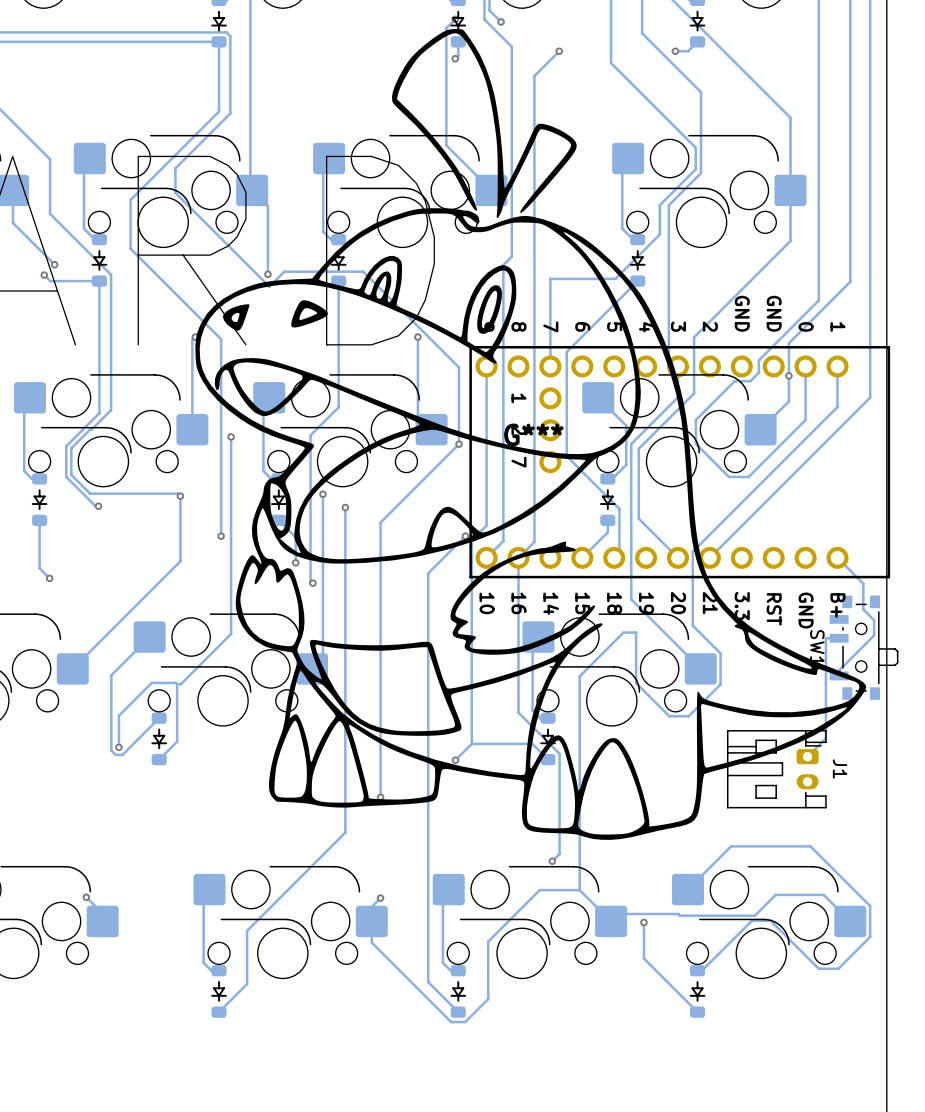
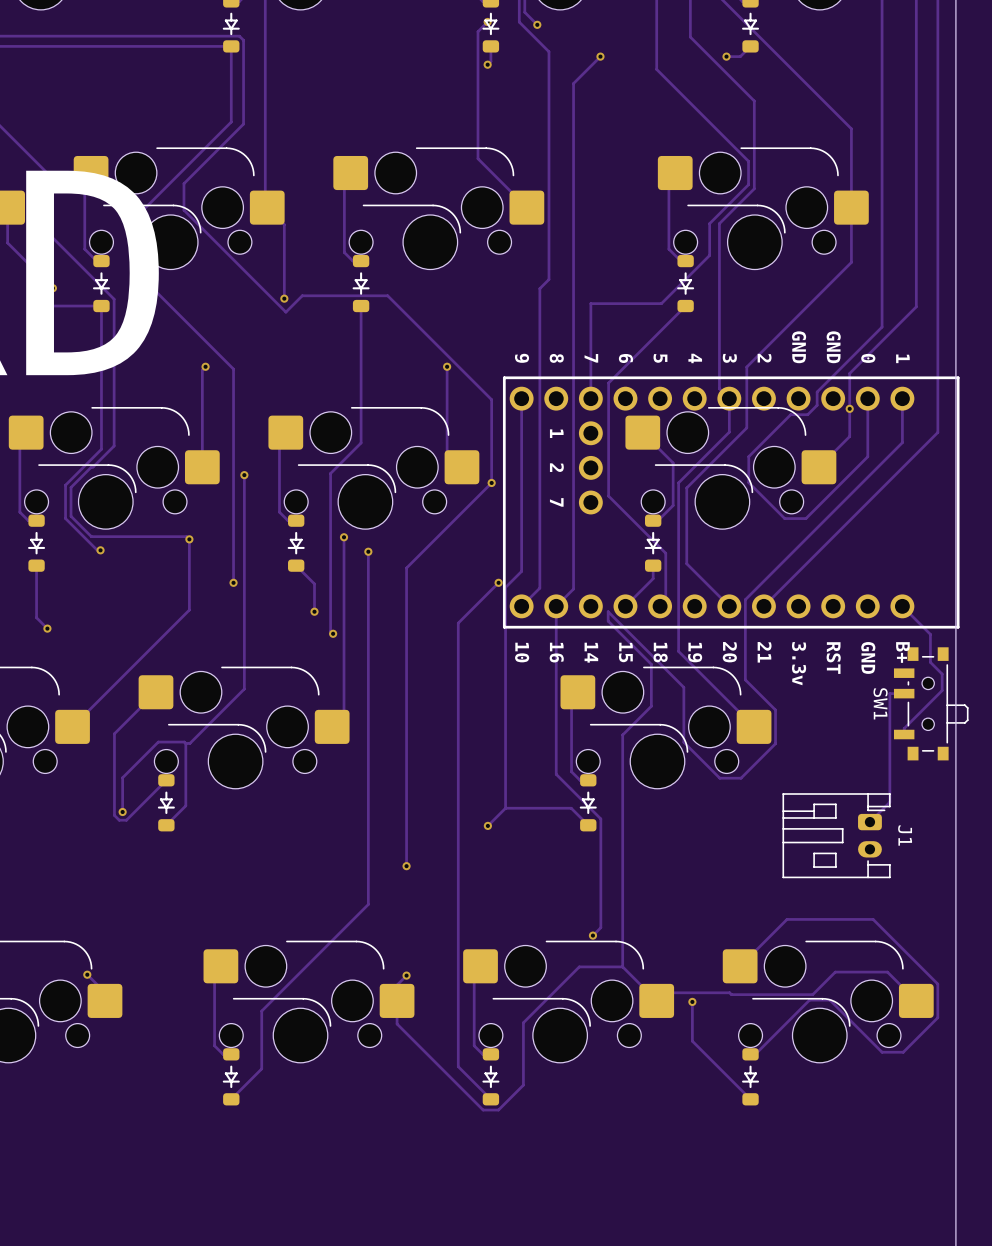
G***: (530, 434) -> none
track: (636, 632) (623, 632) (606, 649) -> (683, 687) (608, 611) (608, 621) (651, 664) (651, 706)

